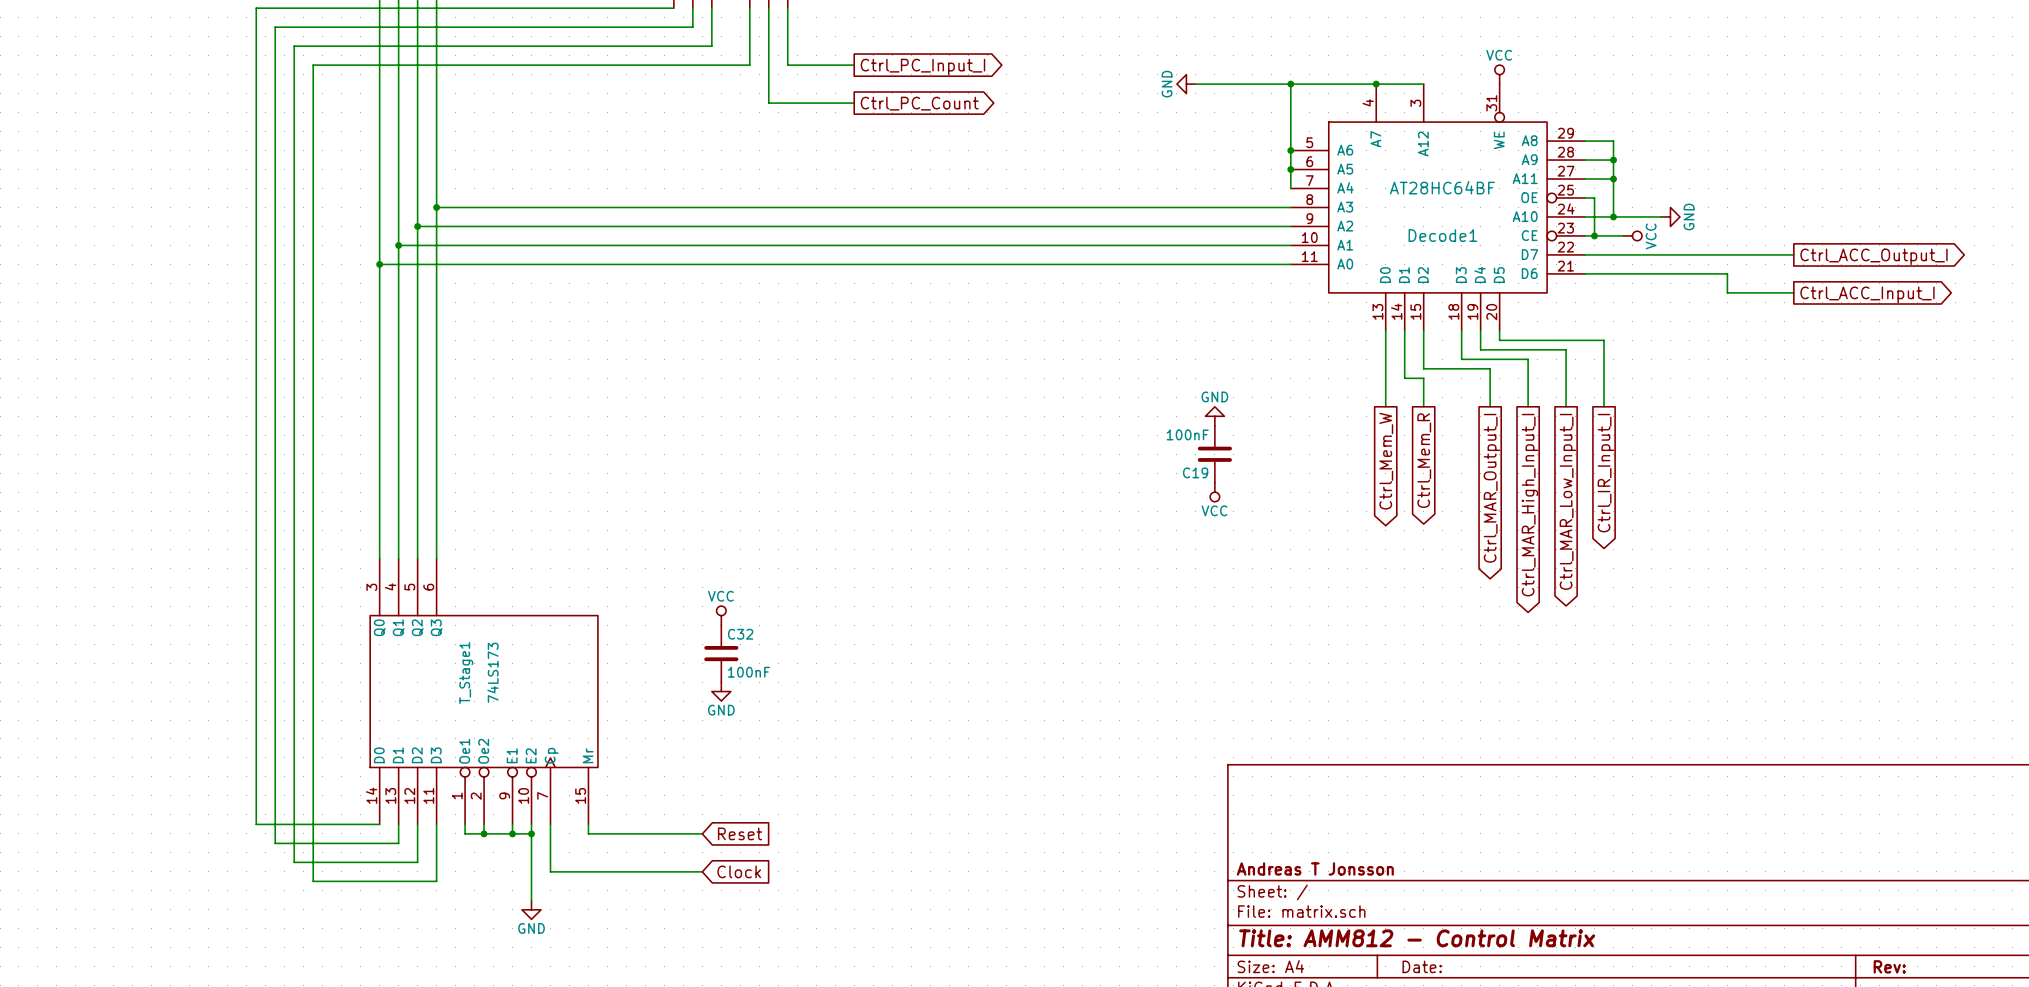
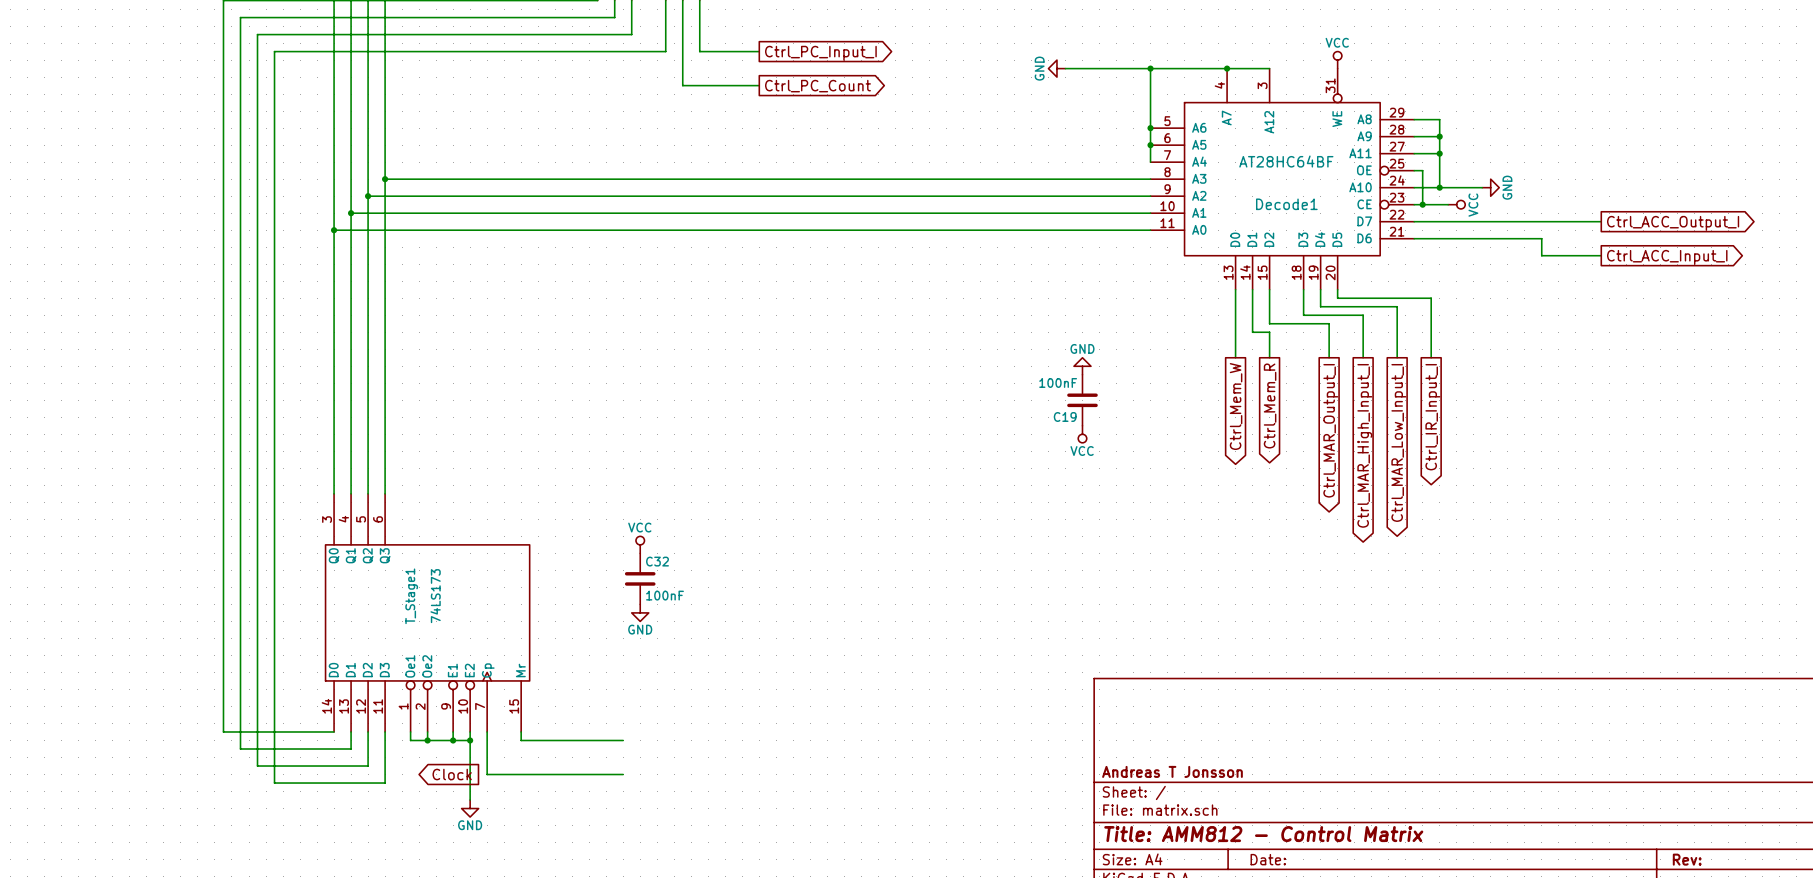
global label: Reset (740, 833) -> none
global label: none -> Clock (452, 774)
global label: Clock (739, 871) -> none

